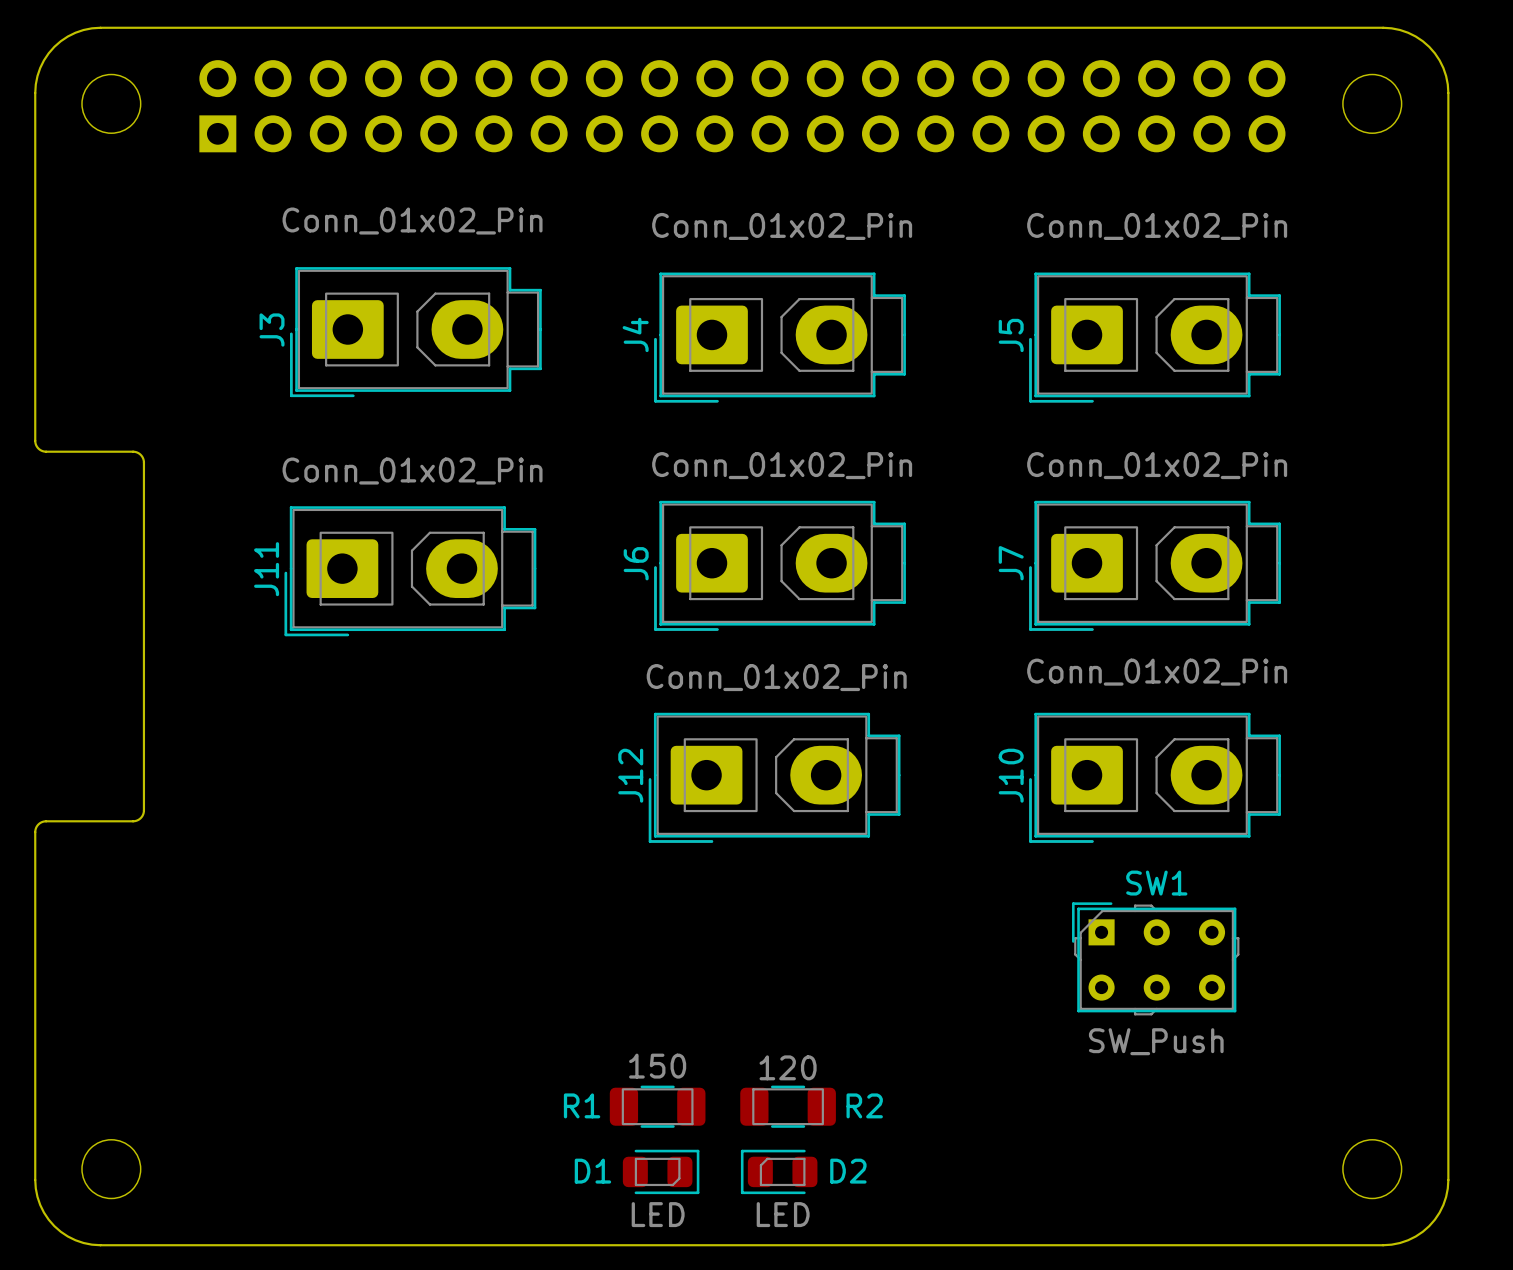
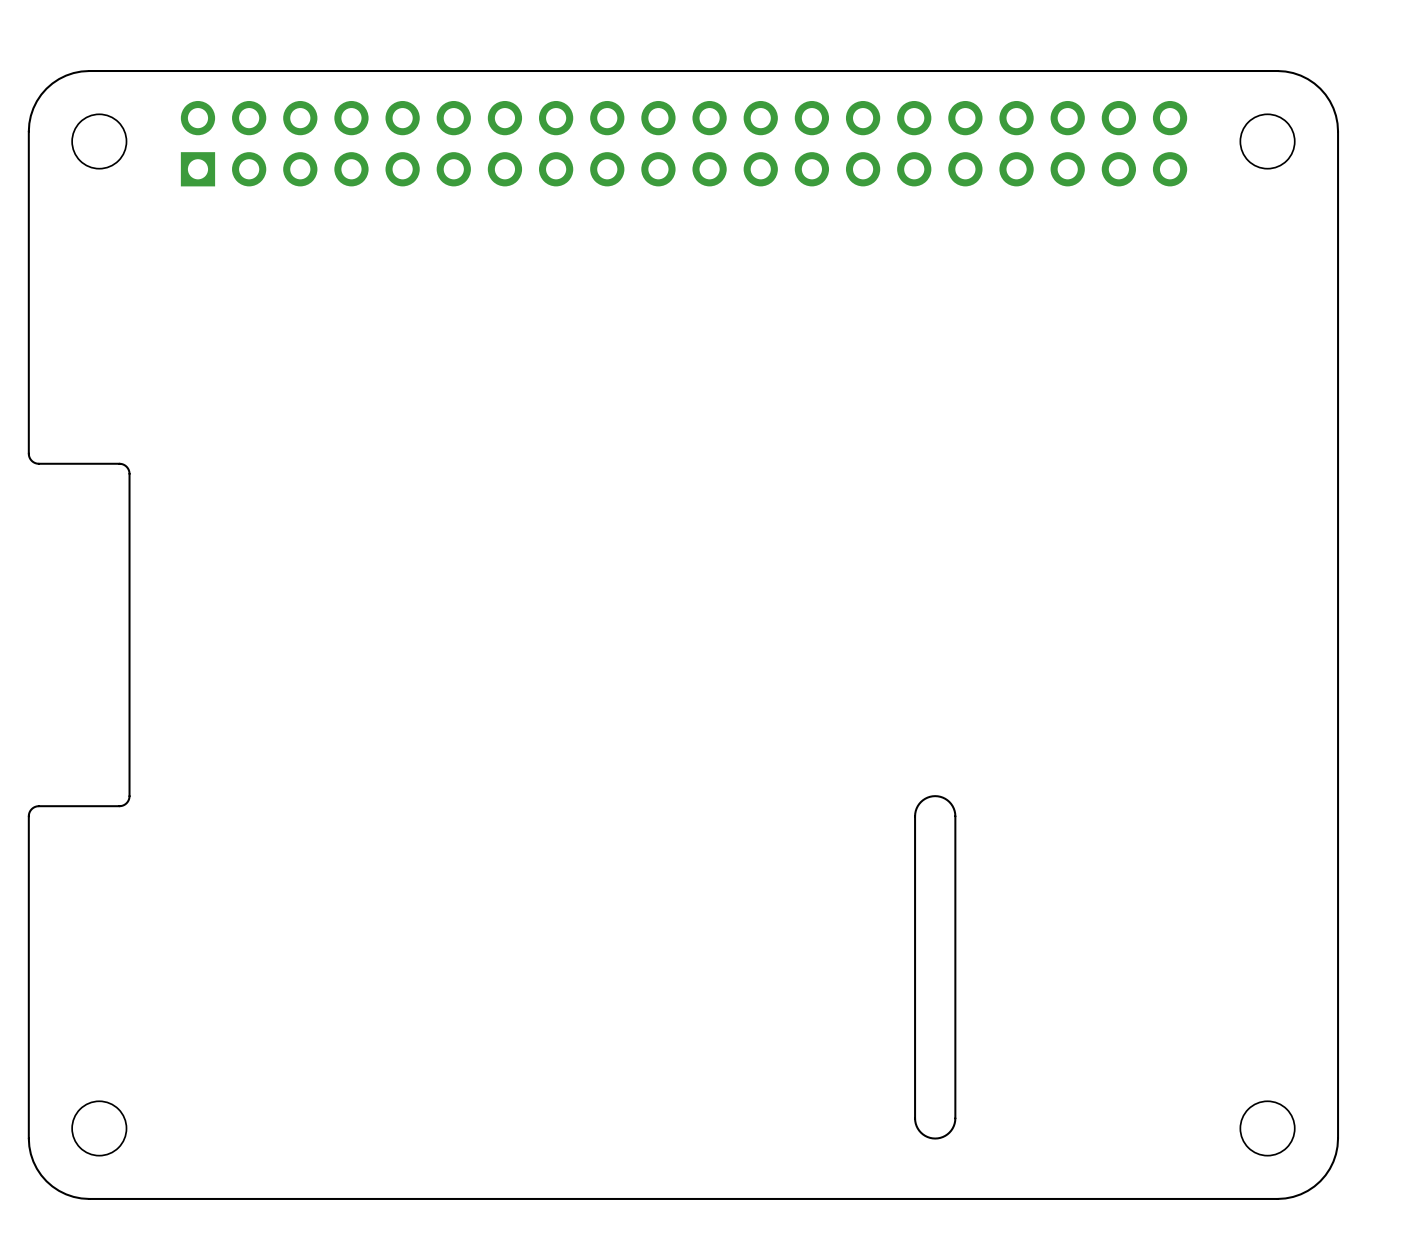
J3: Conn_01x02_Pin (415, 332) -> none
J4: Conn_01x02_Pin (780, 337) -> none
J5: Conn_01x02_Pin (1155, 337) -> none
J6: Conn_01x02_Pin (780, 565) -> none
J7: Conn_01x02_Pin (1155, 565) -> none
J11: Conn_01x02_Pin (410, 571) -> none
J12: Conn_01x02_Pin (774, 777) -> none
J10: Conn_01x02_Pin (1155, 777) -> none
board edge: none -> (915, 816) (915, 1121) (917, 1128) (922, 1134) (930, 1137) (937, 1138) (949, 1132) (953, 1126) (955, 1118) (955, 813) (949, 802) (942, 797) (935, 796) (927, 797) (920, 802) (916, 808) (915, 816)
SW1: SW_Push (1155, 958) -> none
R1: 150 (657, 1106) -> none
R2: 120 (788, 1106) -> none
D1: LED (661, 1171) -> none
D2: LED (779, 1171) -> none

